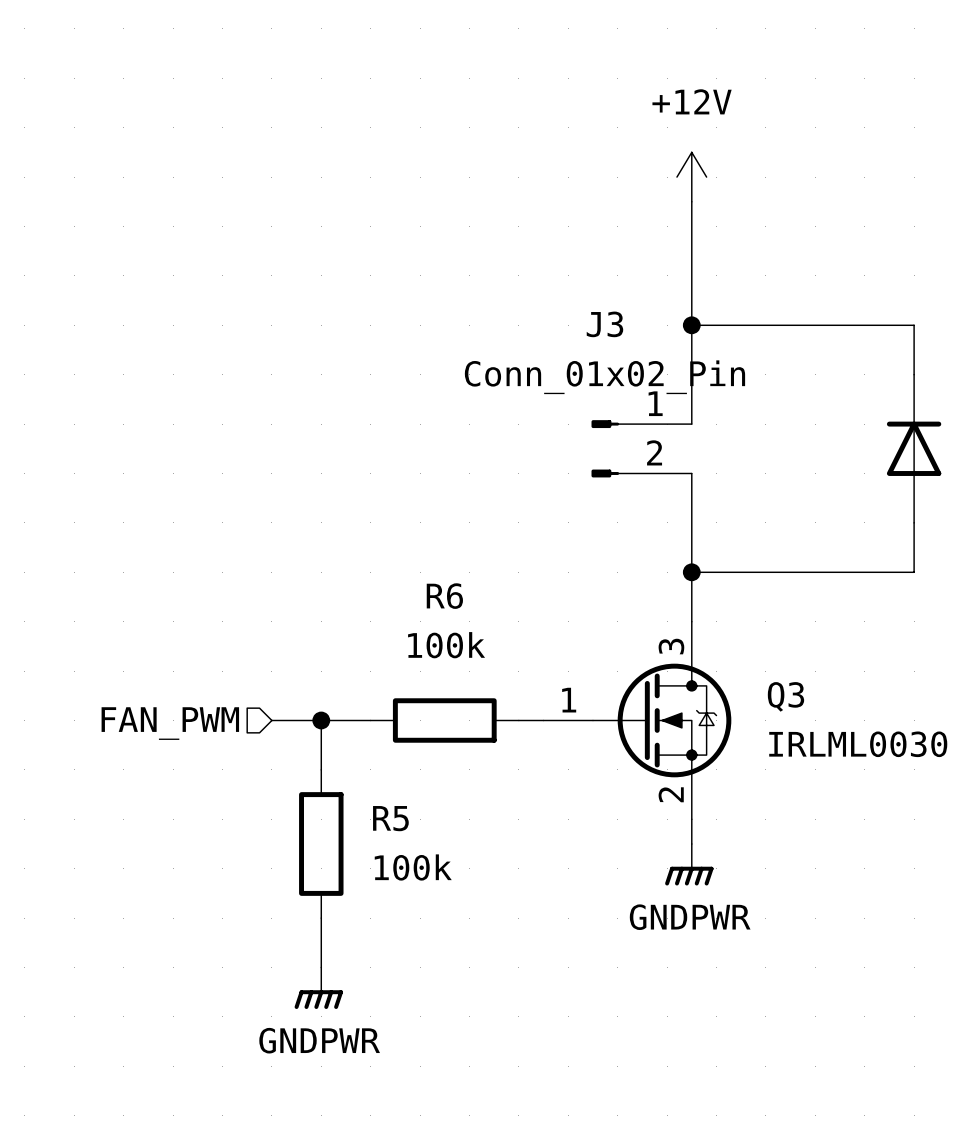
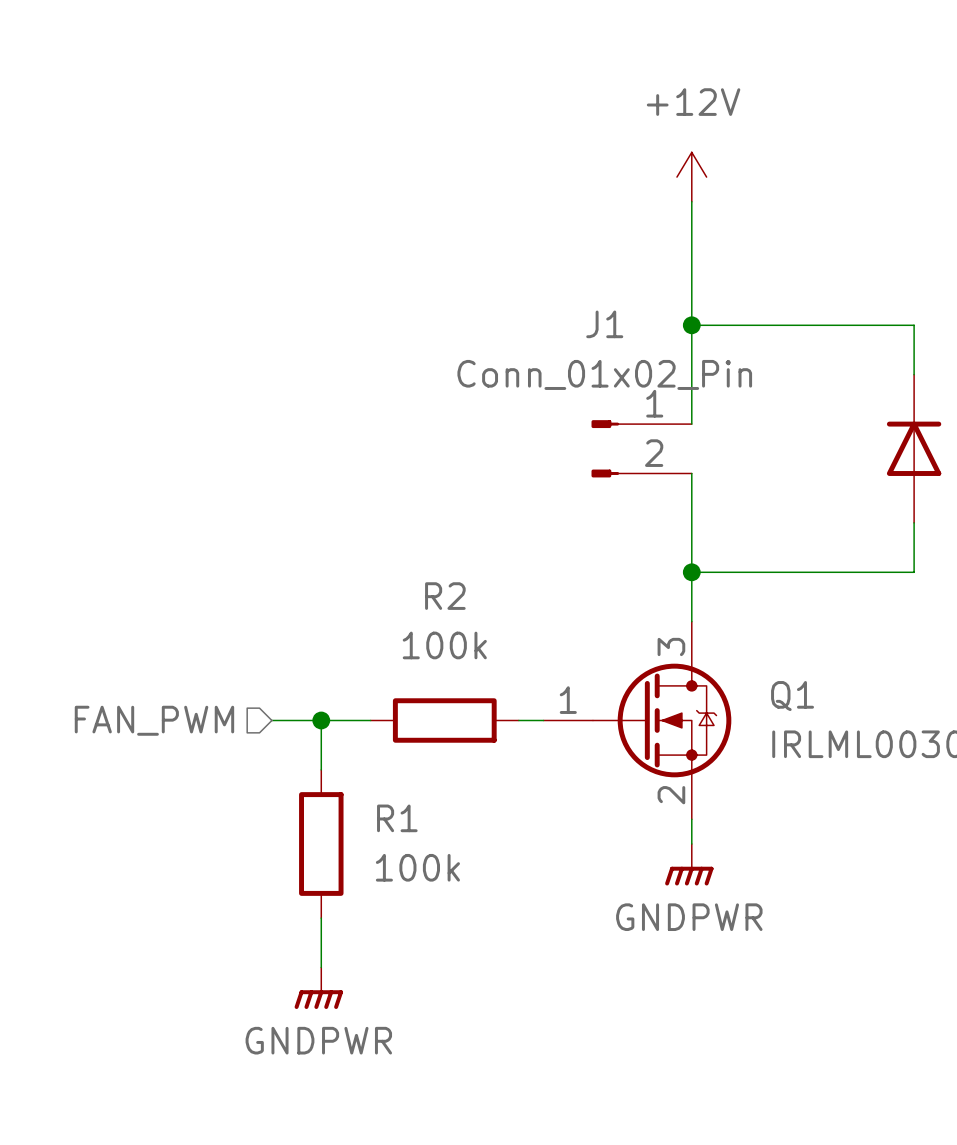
J3 name: J3 (604, 324) -> J1 (604, 324)
R6 name: R6 (444, 596) -> R2 (445, 596)
Q3 name: Q3 (785, 696) -> Q1 (792, 696)
R5 name: R5 (390, 818) -> R1 (397, 818)

